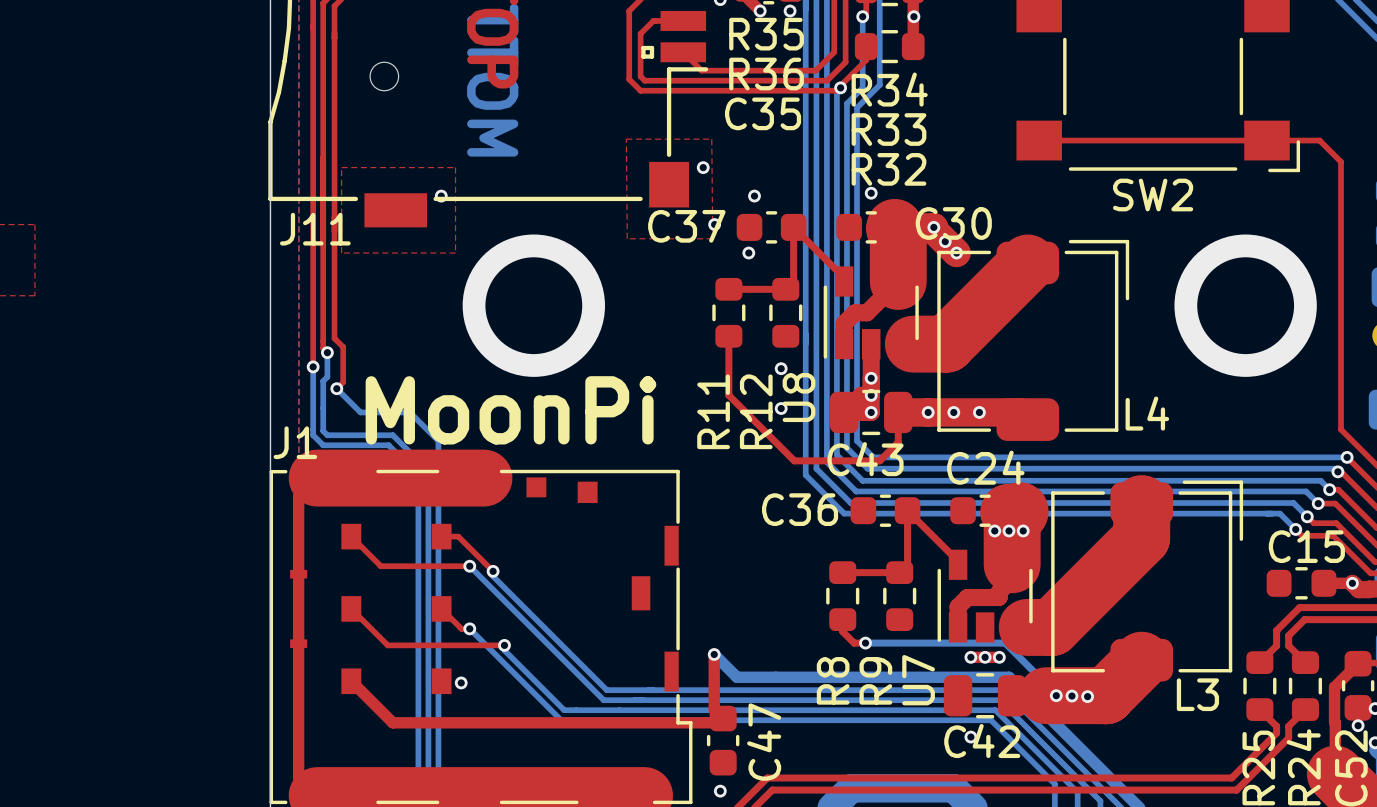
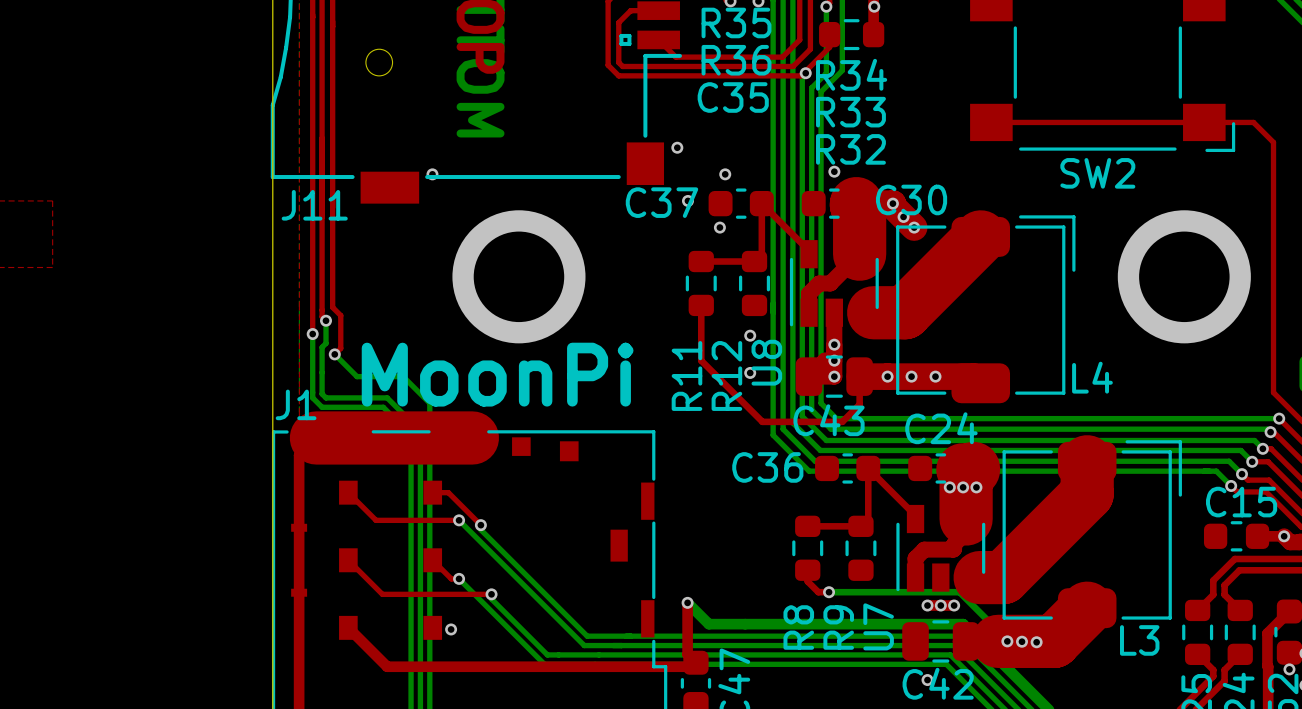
top zone outline: (626, 139) (627, 238) (712, 238) (711, 139) (626, 139) -> none
top zone outline: (341, 167) (341, 253) (455, 253) (455, 167) (341, 167) -> none

